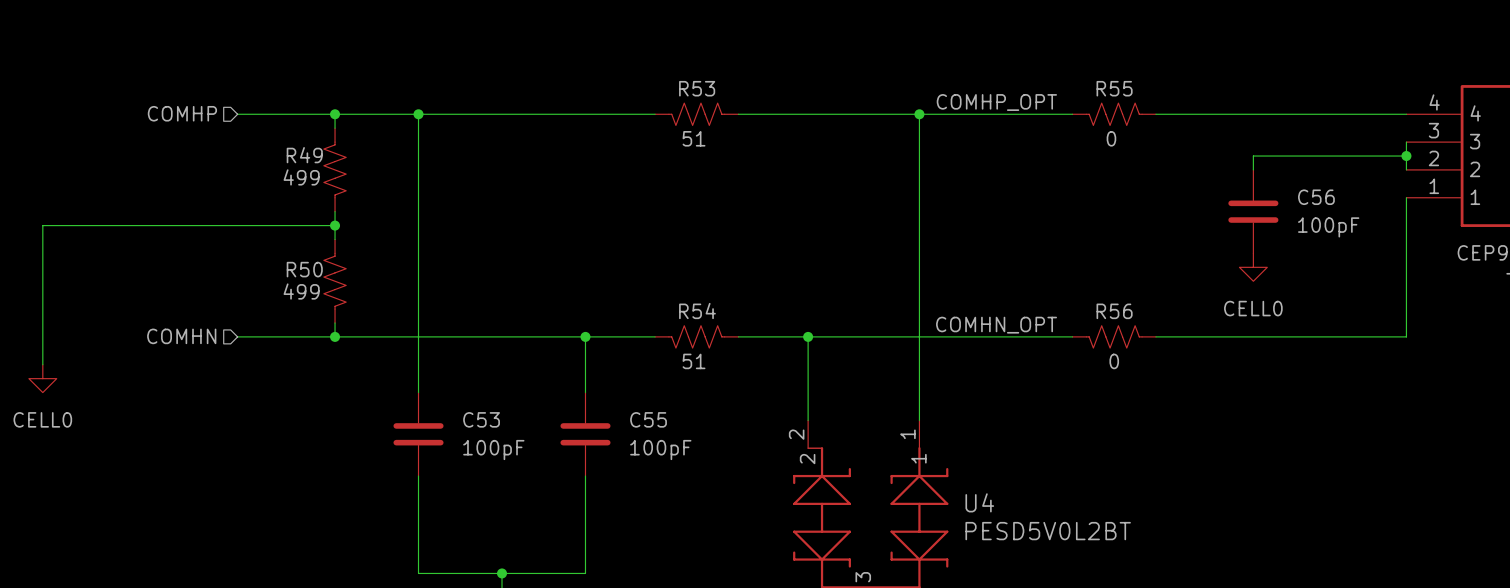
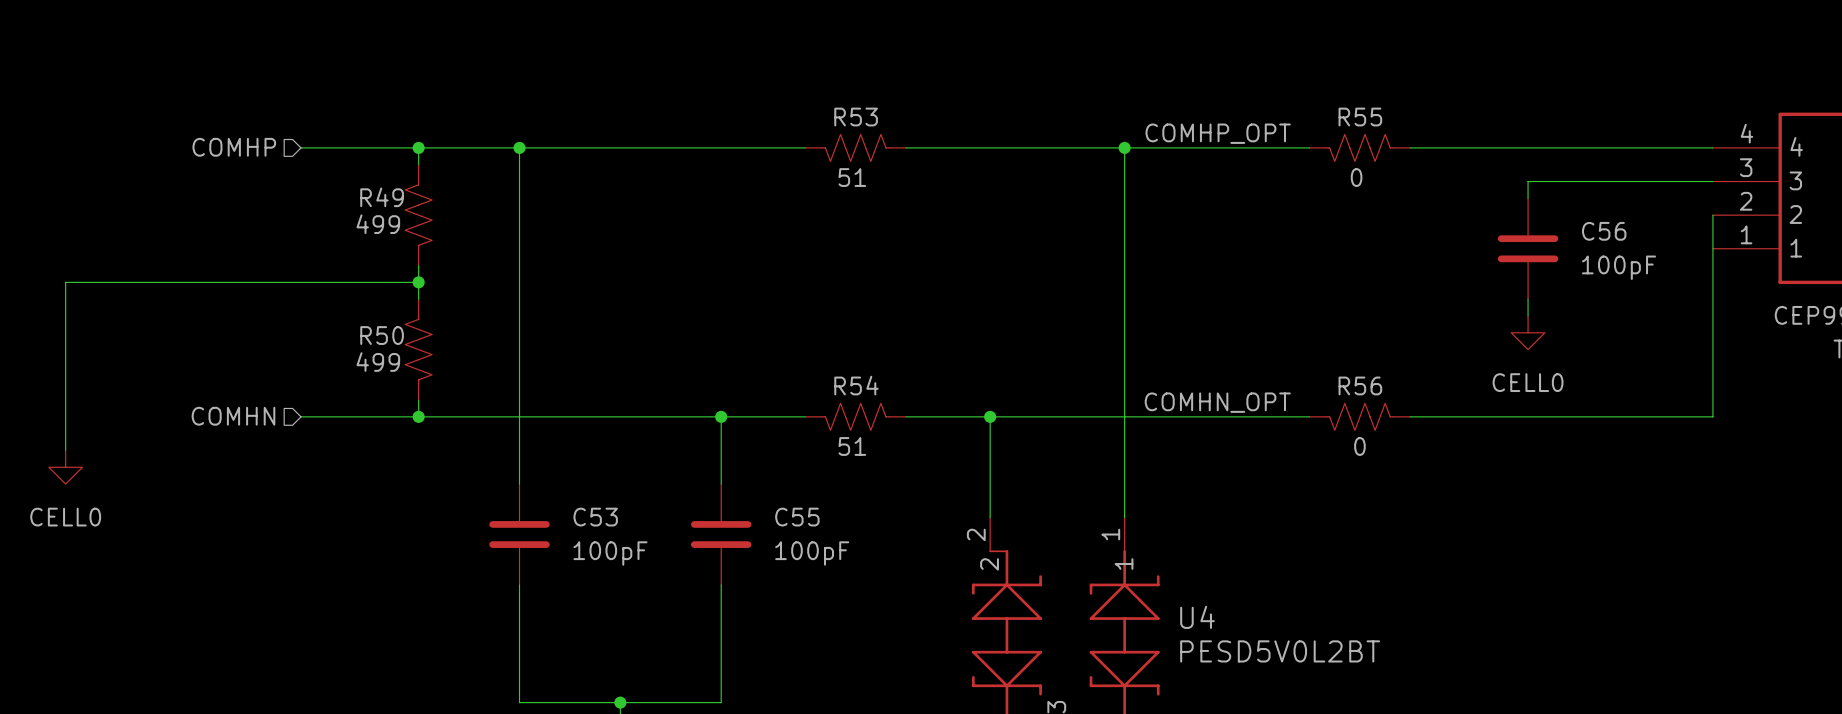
wire: (1406, 142) (1406, 169) -> (1712, 248) (1712, 215)
wire: (1406, 156) (1253, 156) (1253, 169) -> (1712, 181) (1528, 181) (1528, 198)
junction: (1406, 156) -> none
C56 position: (1253, 211) -> (1528, 248)

